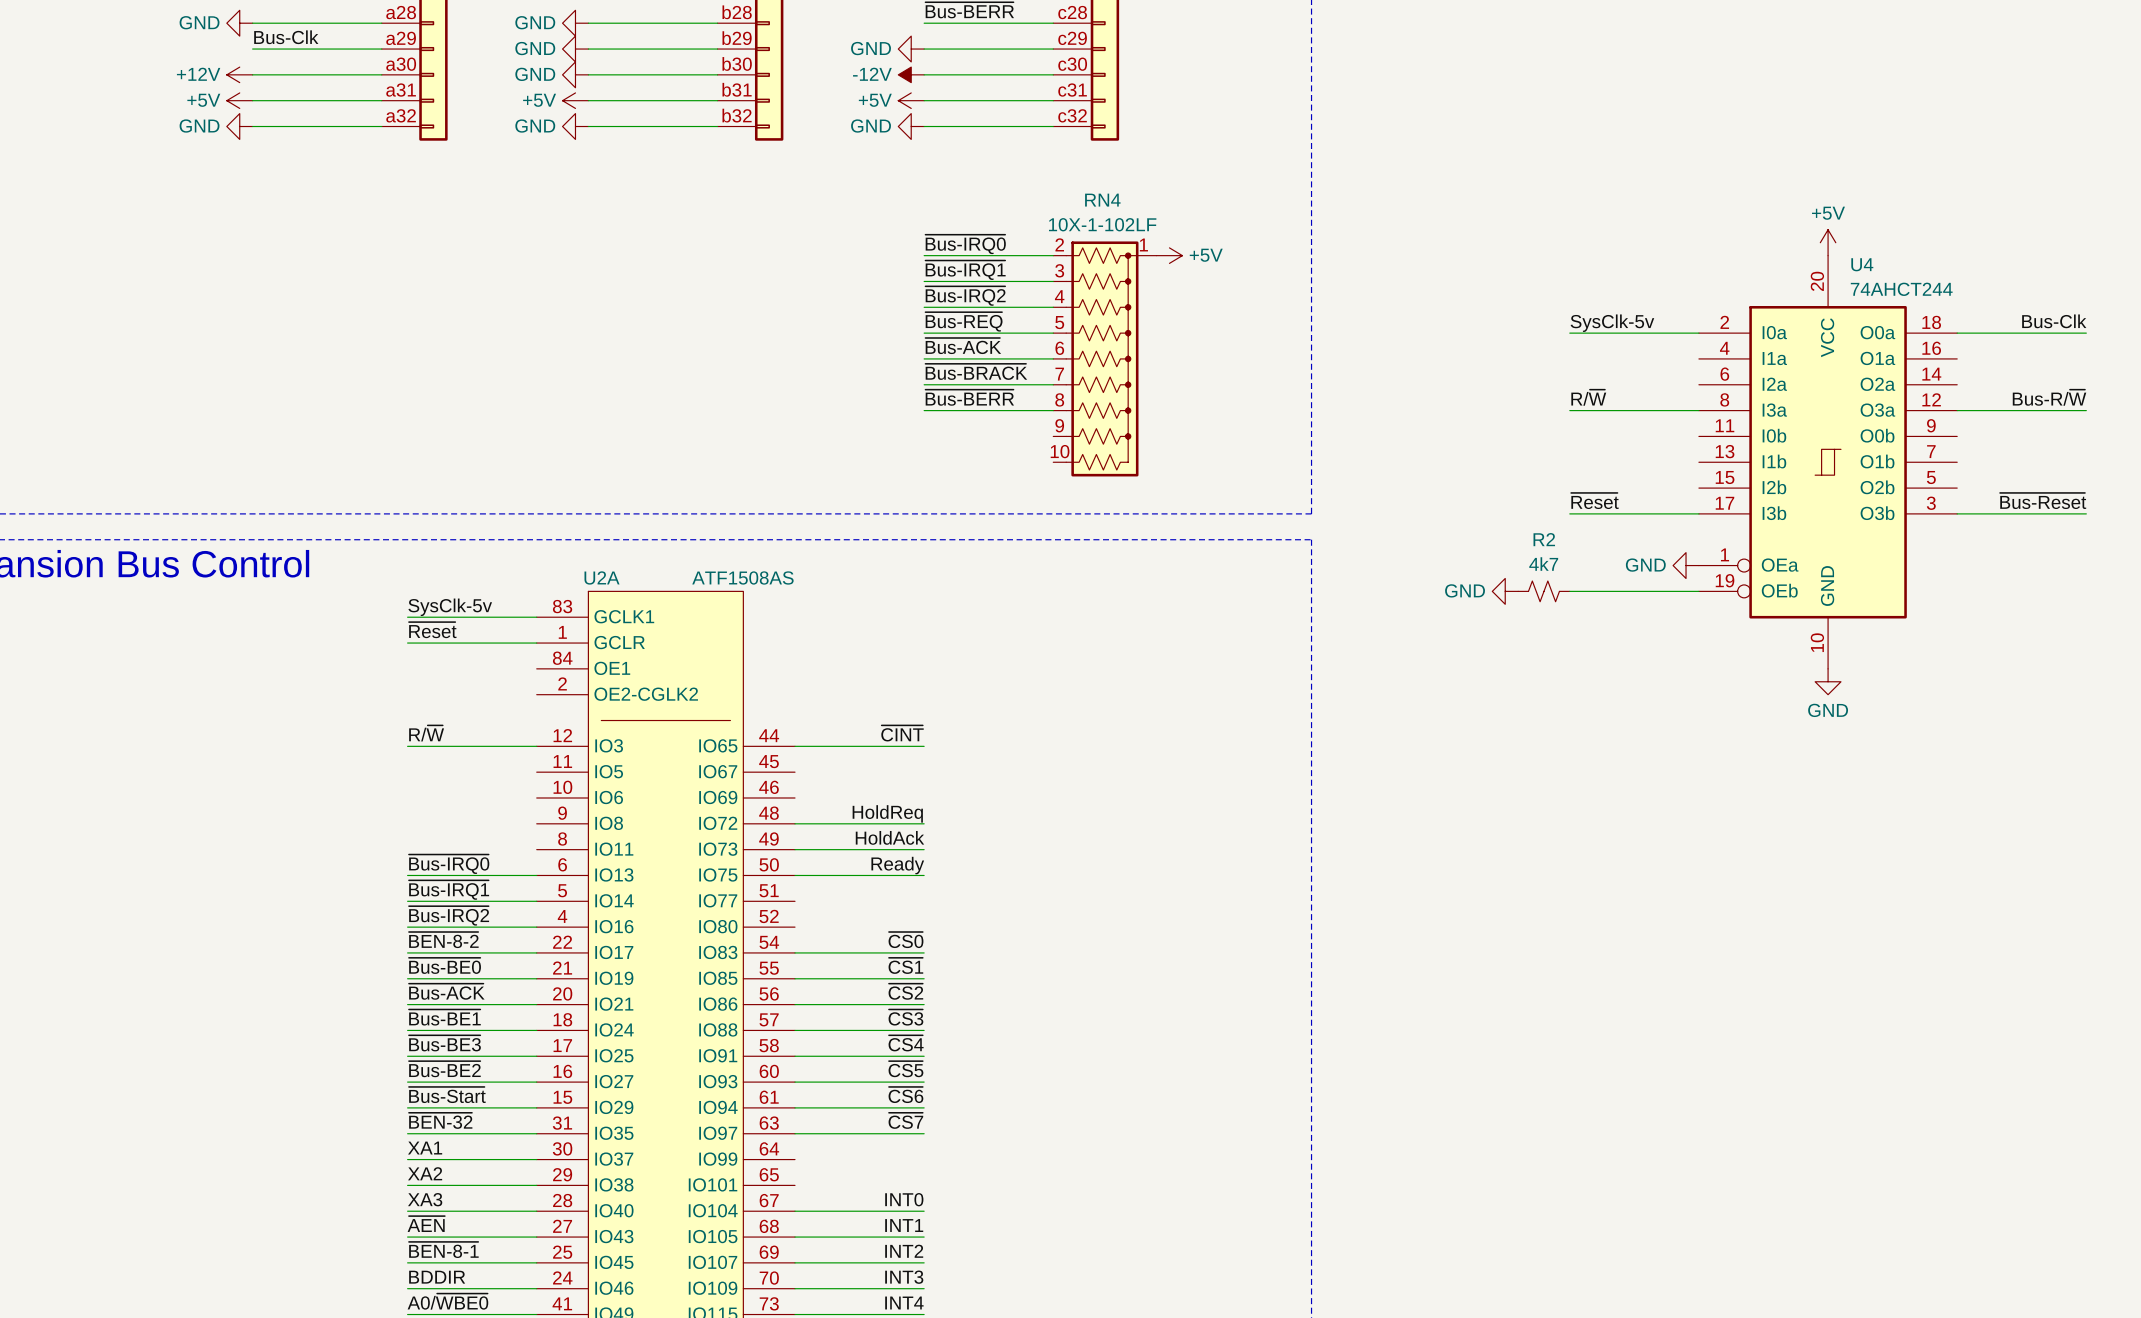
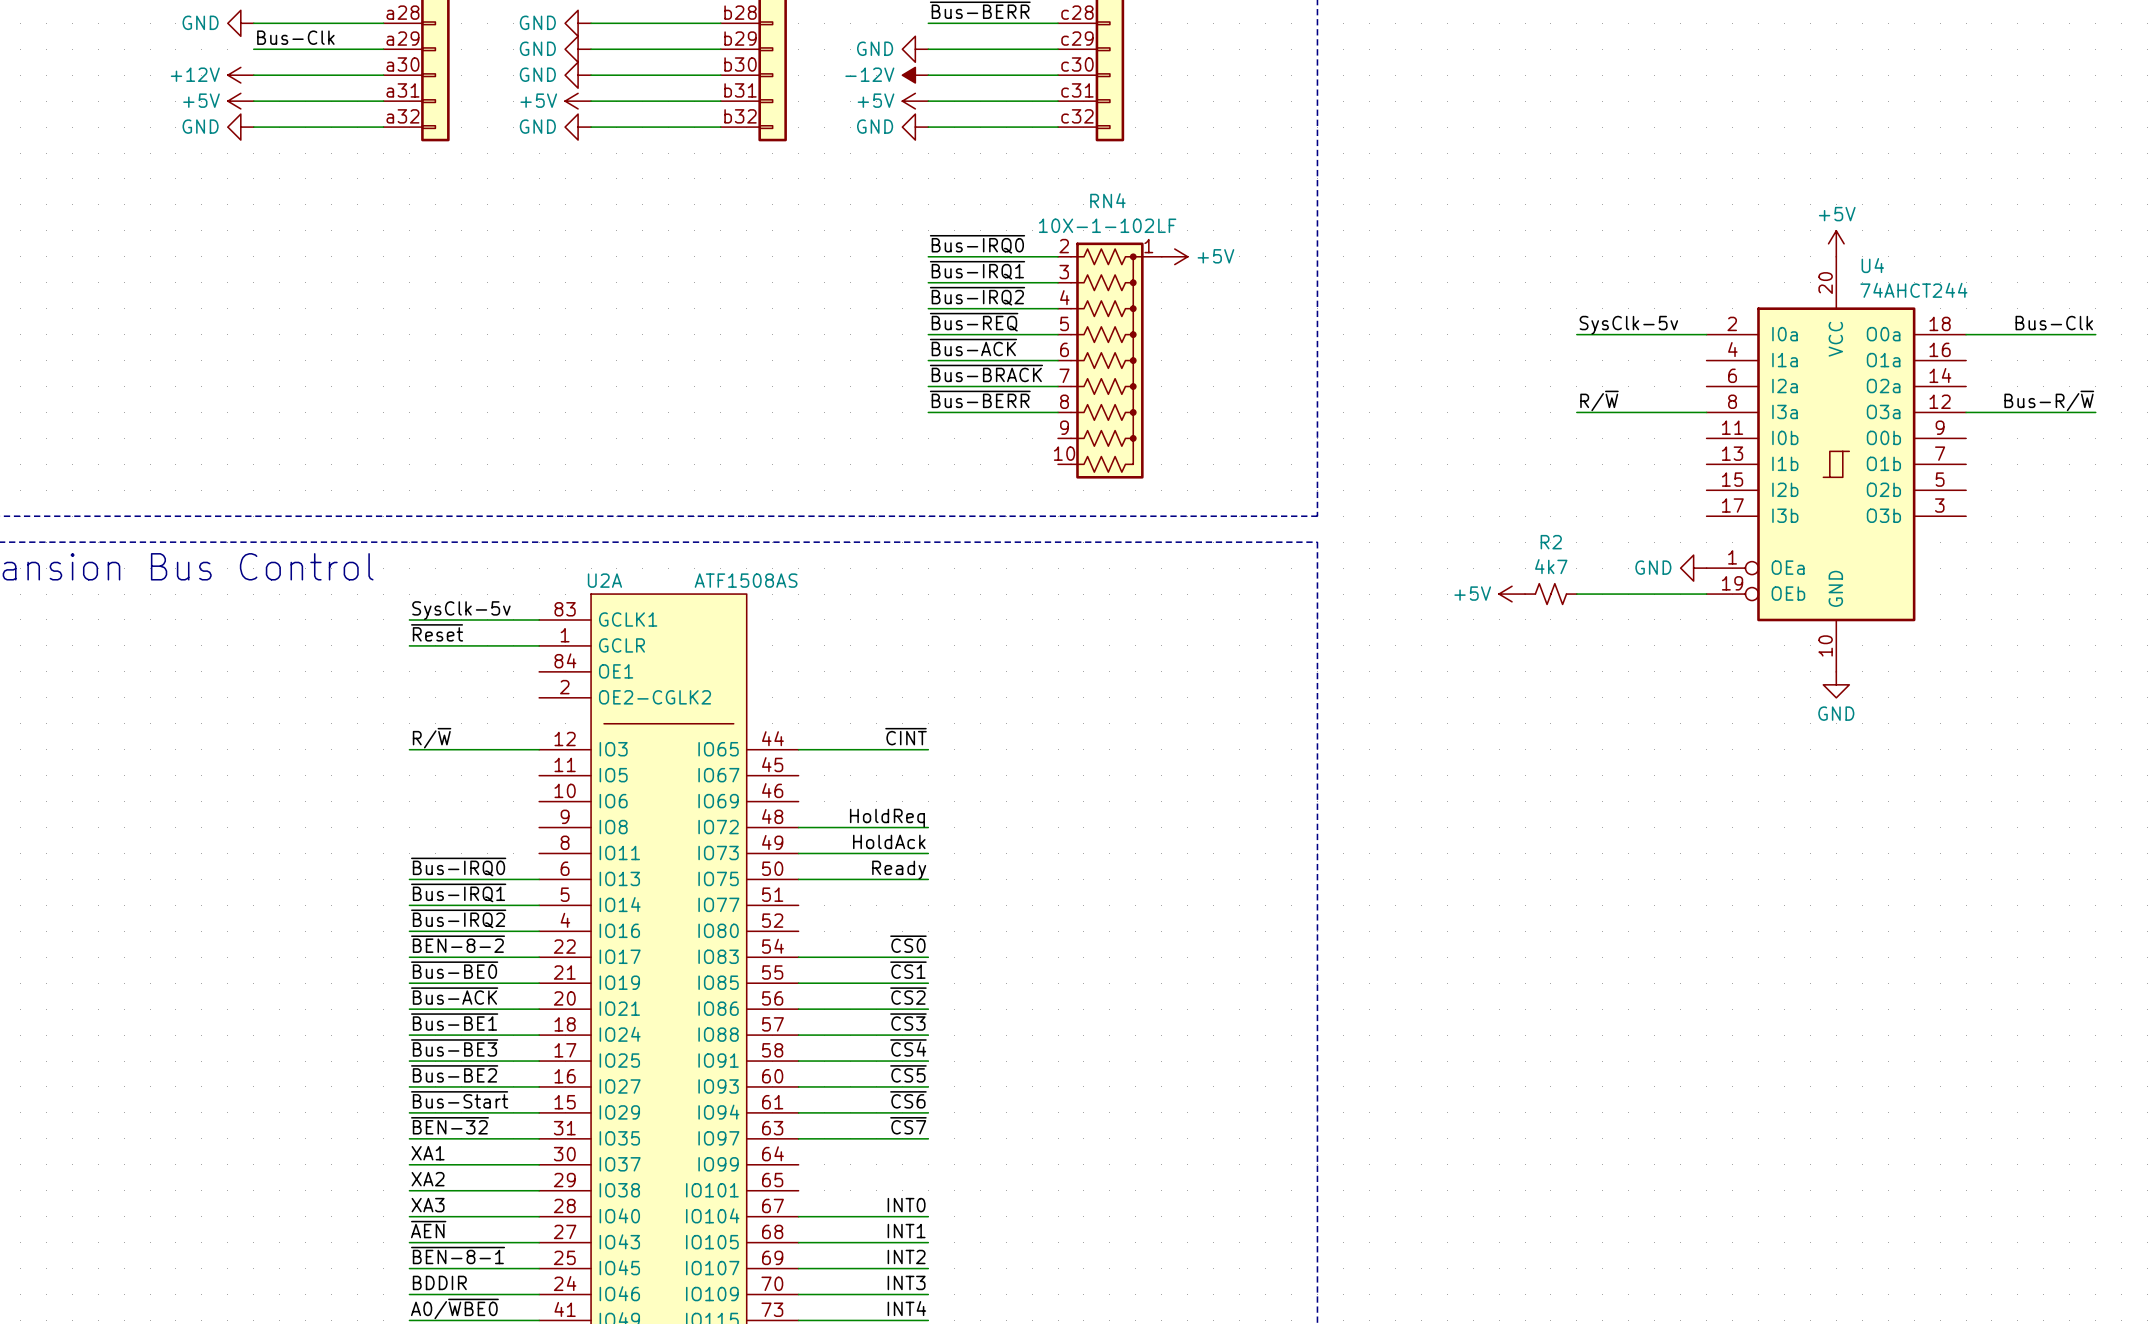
label: ~{Reset} (1594, 500) -> none
label: ~{Bus-Reset} (2043, 500) -> none
wire: (1569, 513) (1698, 513) -> none
wire: (1957, 513) (2086, 513) -> none
power symbol: GND (1505, 591) -> +5V (1512, 594)

